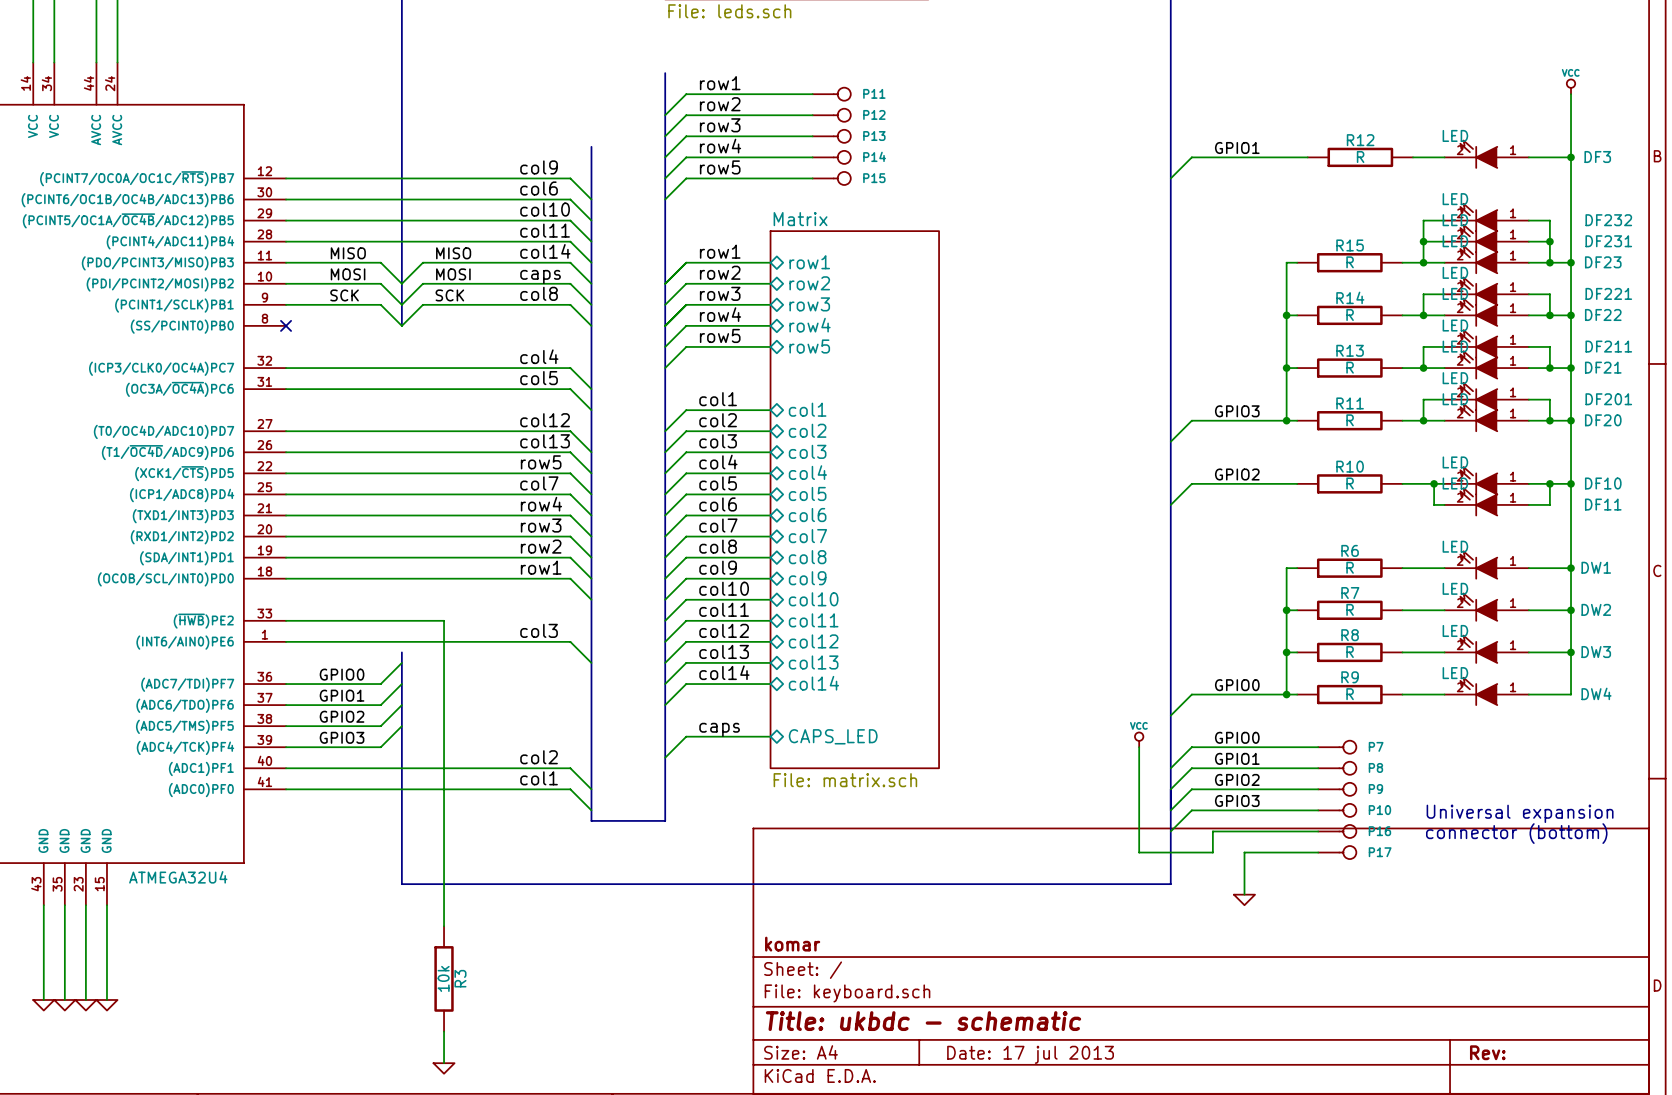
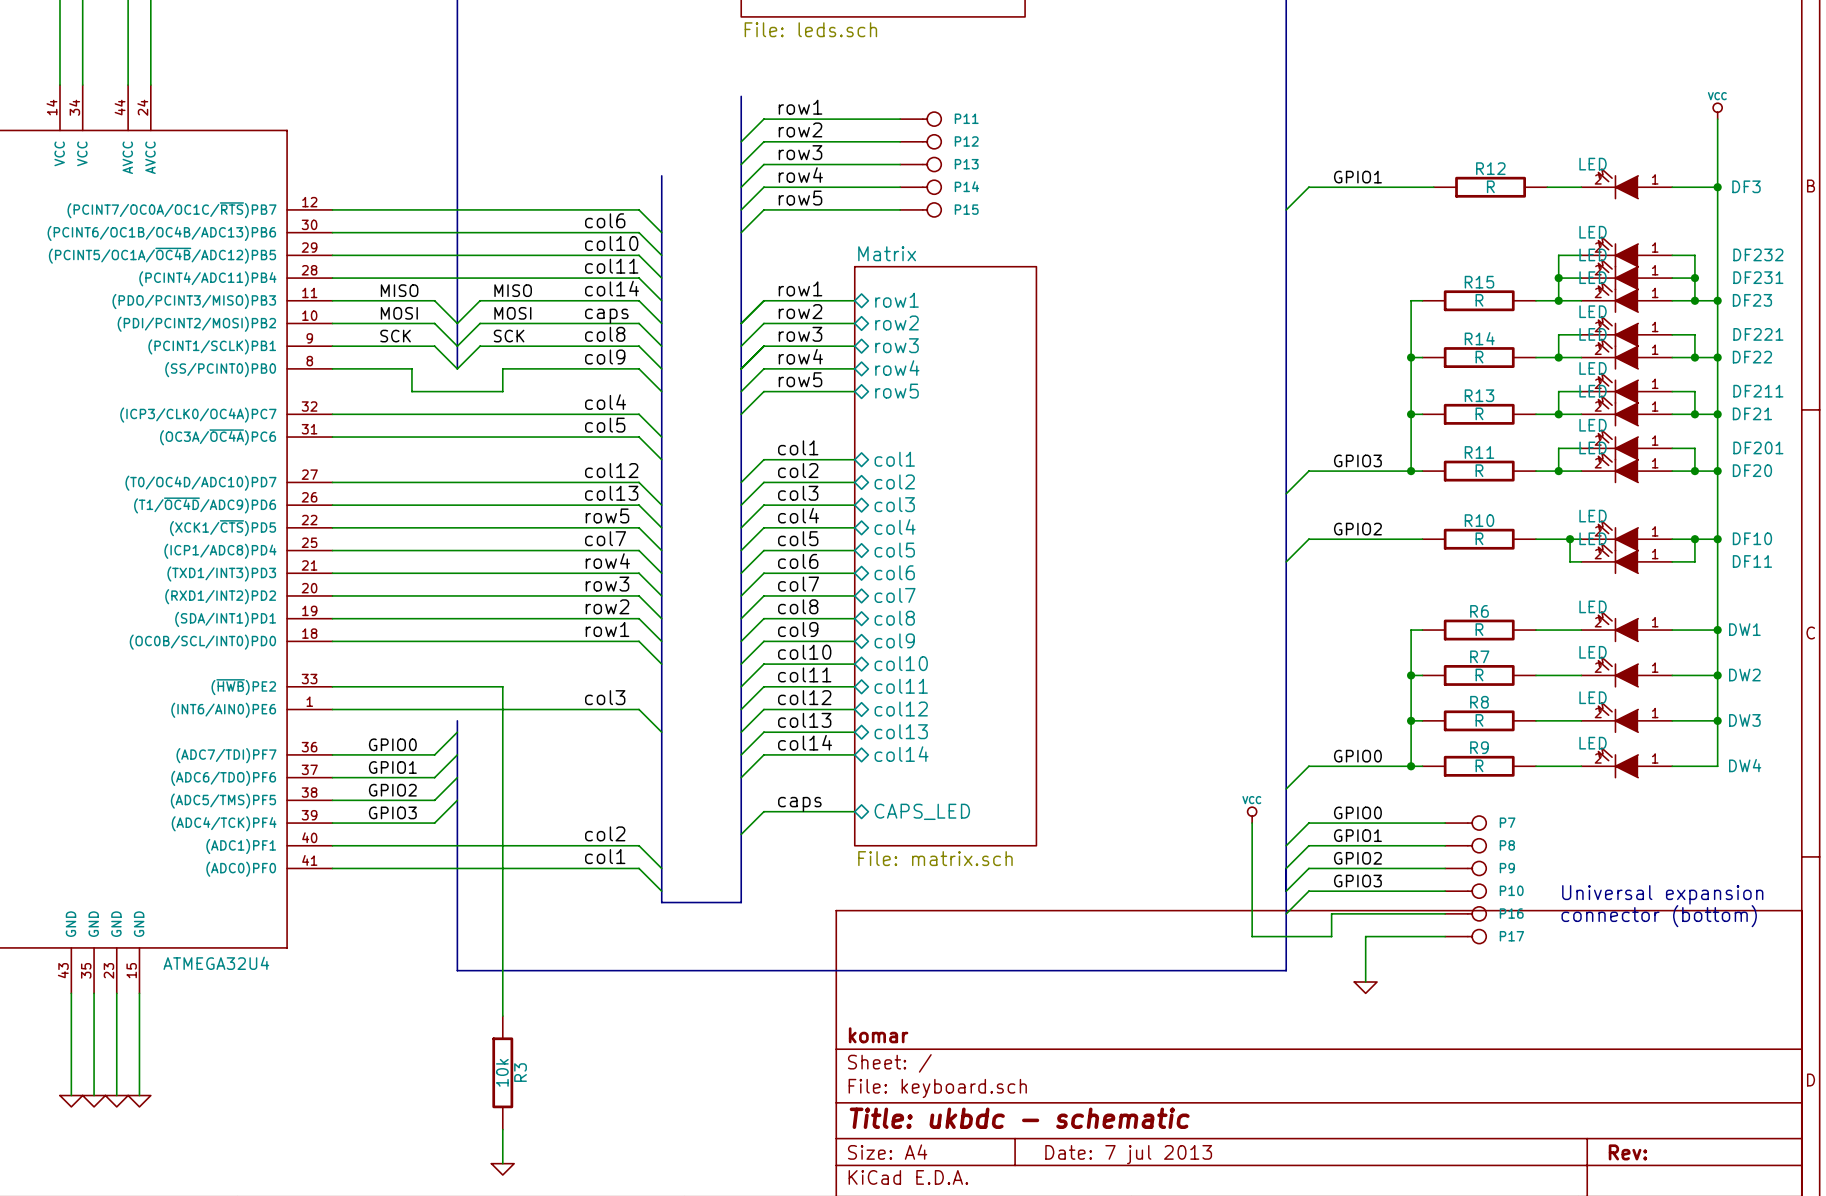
label position: col9 (539, 167) -> col9 (605, 357)
wire: none -> (332, 368) (411, 368) (411, 391) (502, 391) (502, 368) (639, 368) (661, 391)
no-connect mark: (286, 325) -> none
title block: Date: 17 jul 2013 (1030, 1054) -> Date: 7 jul 2013 (1128, 1154)

